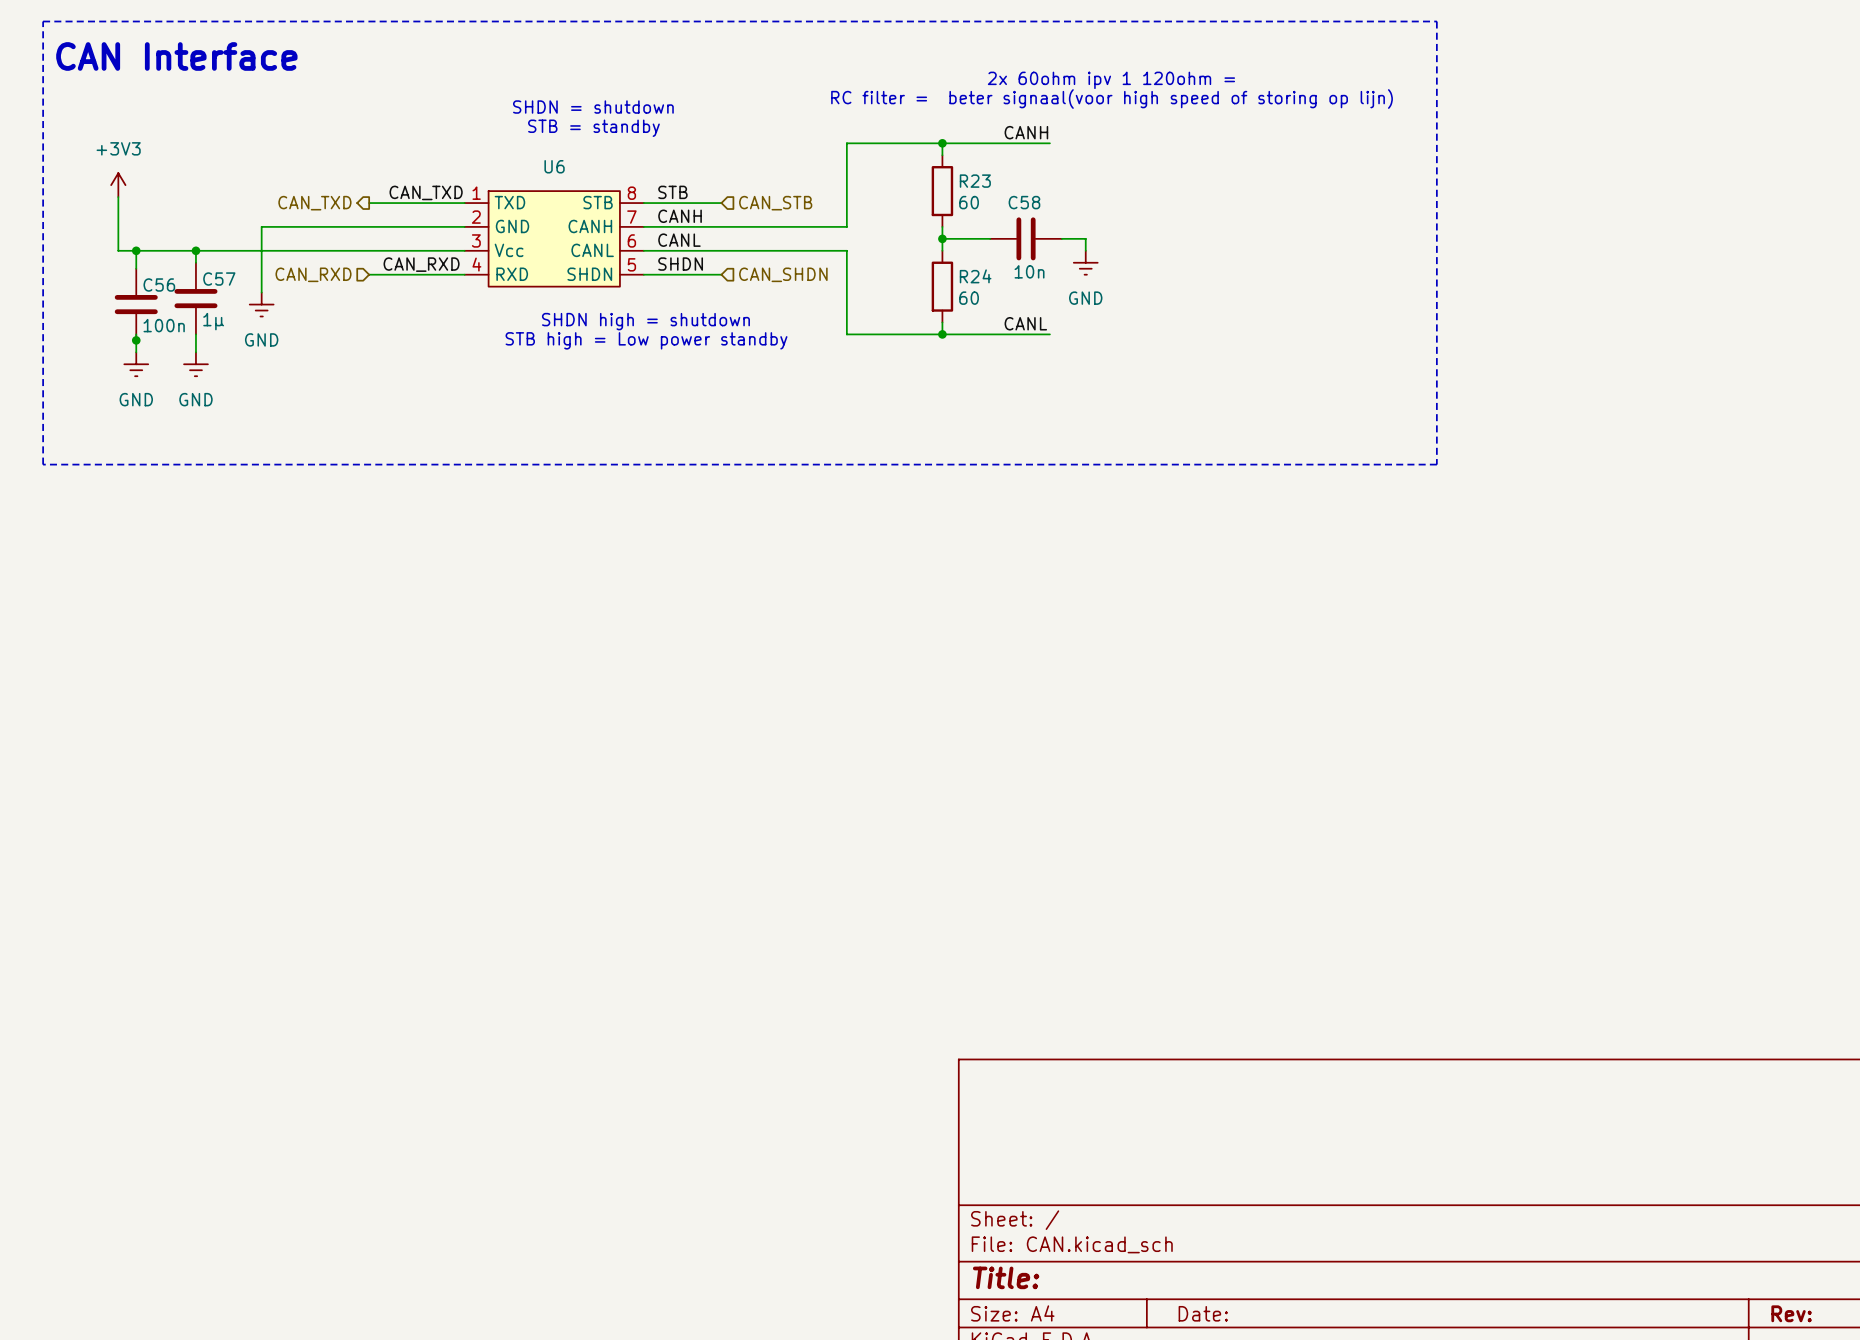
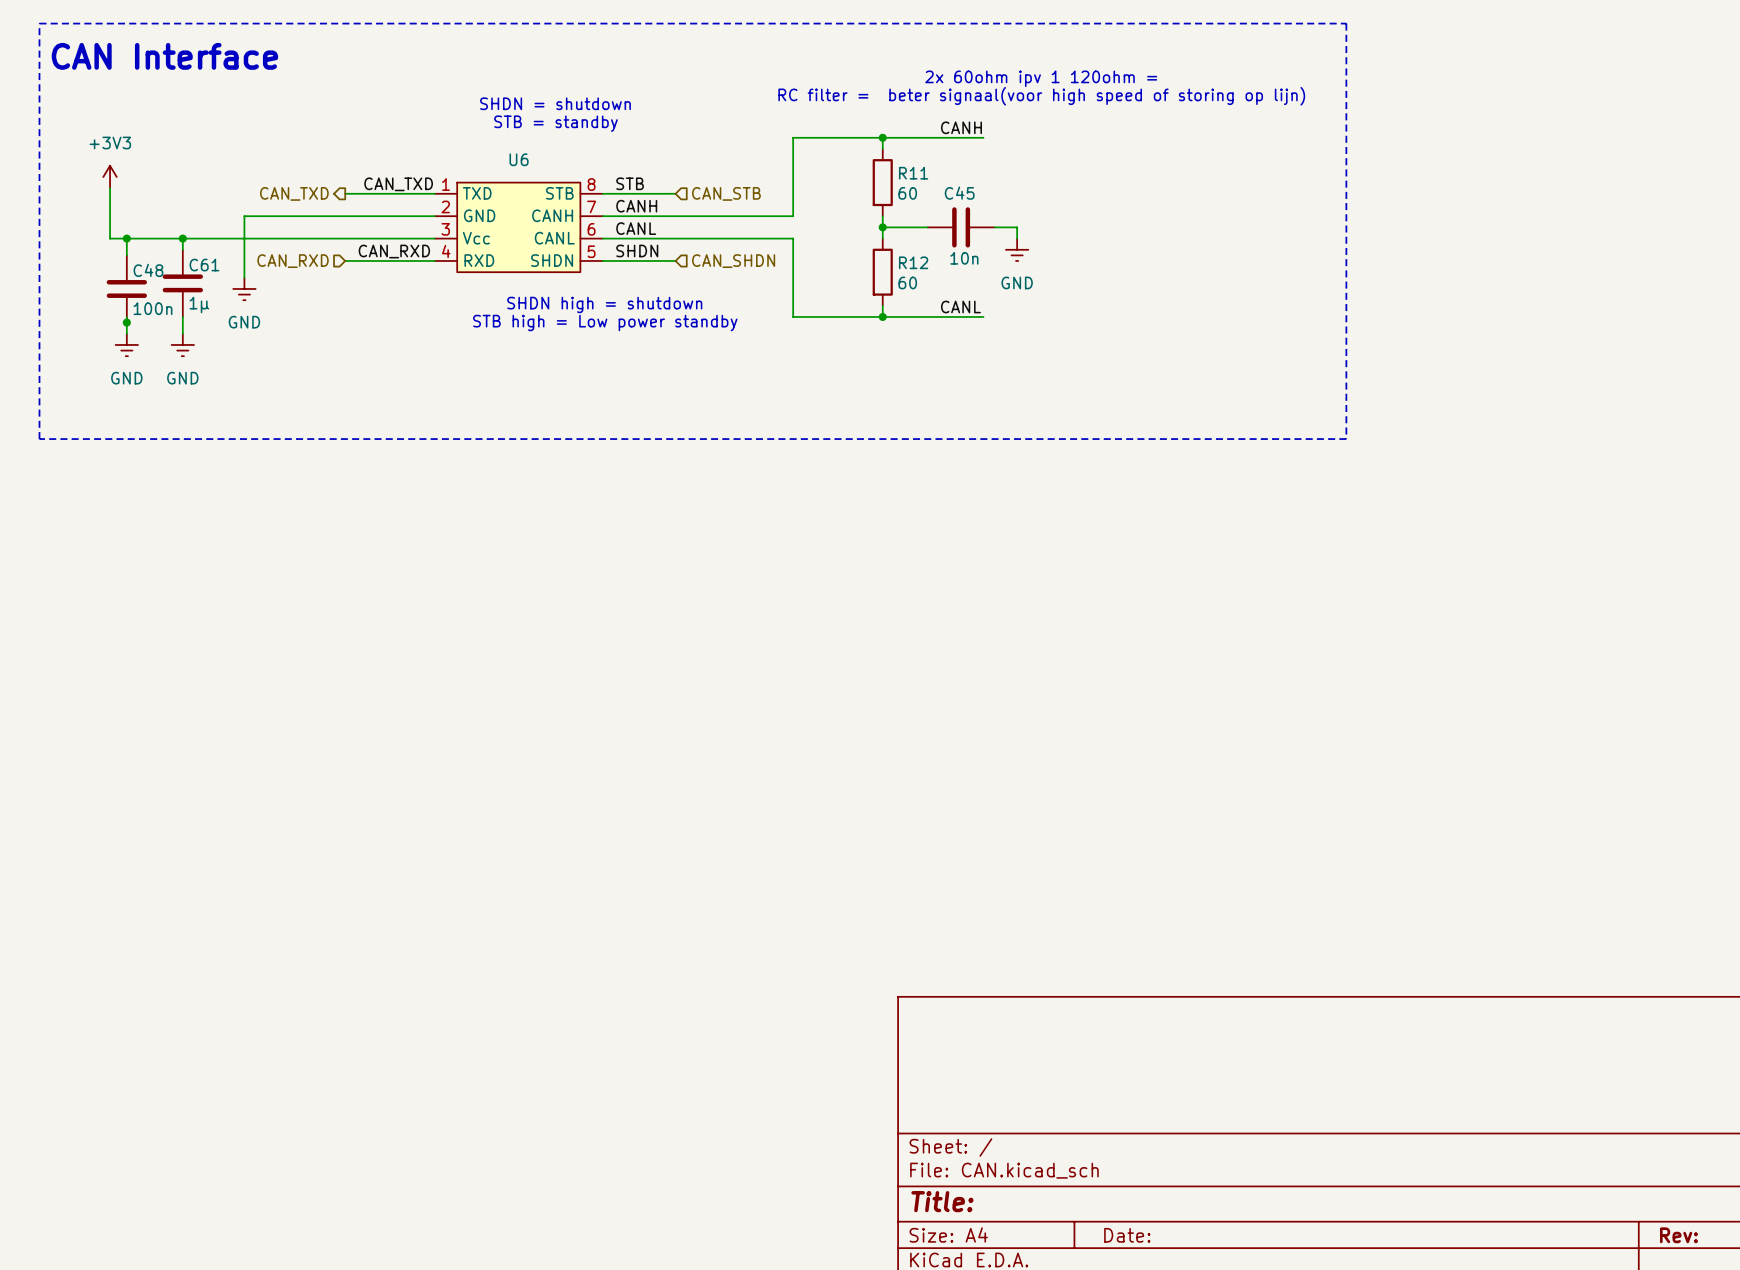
R23 name: R23 (975, 181) -> R11 (913, 173)
C58 name: C58 (1024, 202) -> C45 (959, 193)
R24 name: R24 (975, 276) -> R12 (913, 262)
C57 name: C57 (219, 279) -> C61 (204, 265)
C56 name: C56 (159, 285) -> C48 (148, 270)

